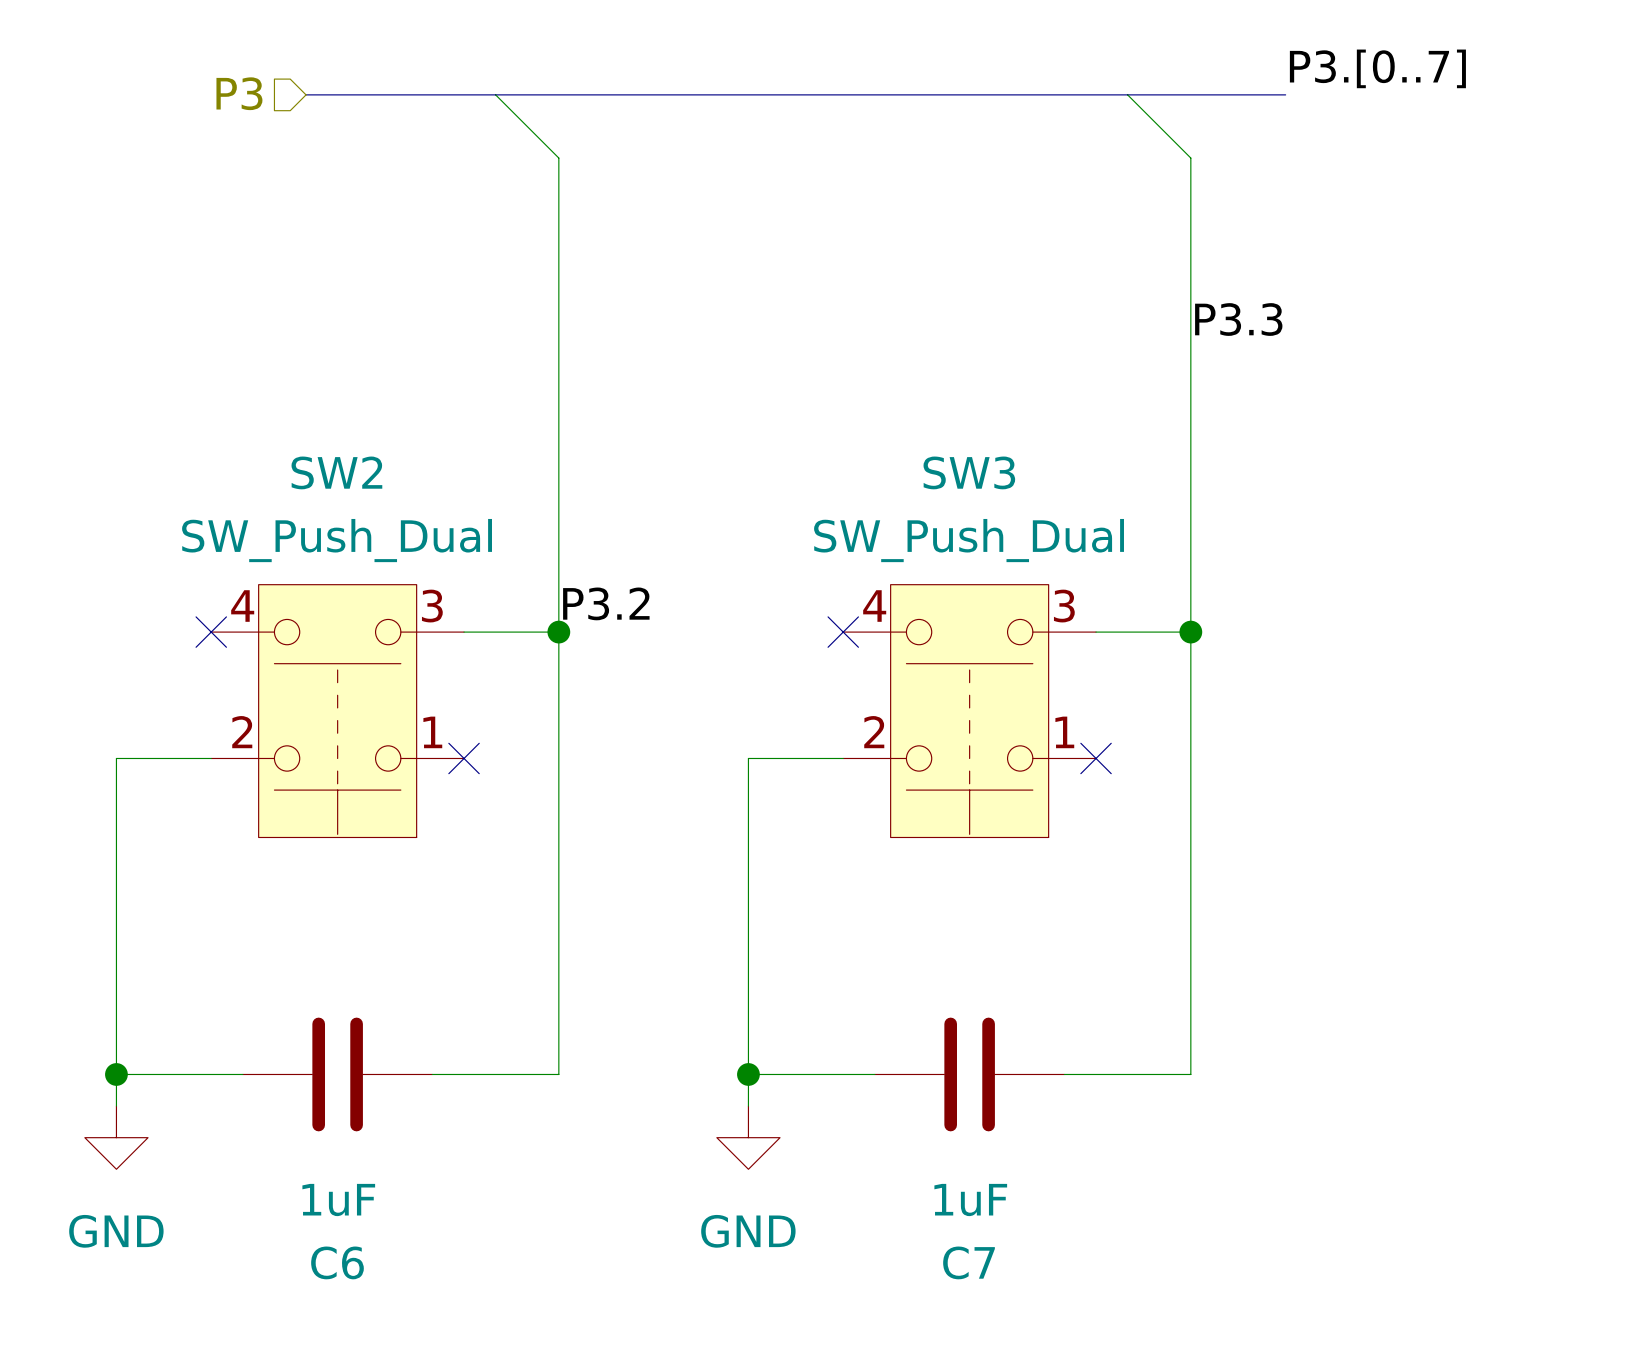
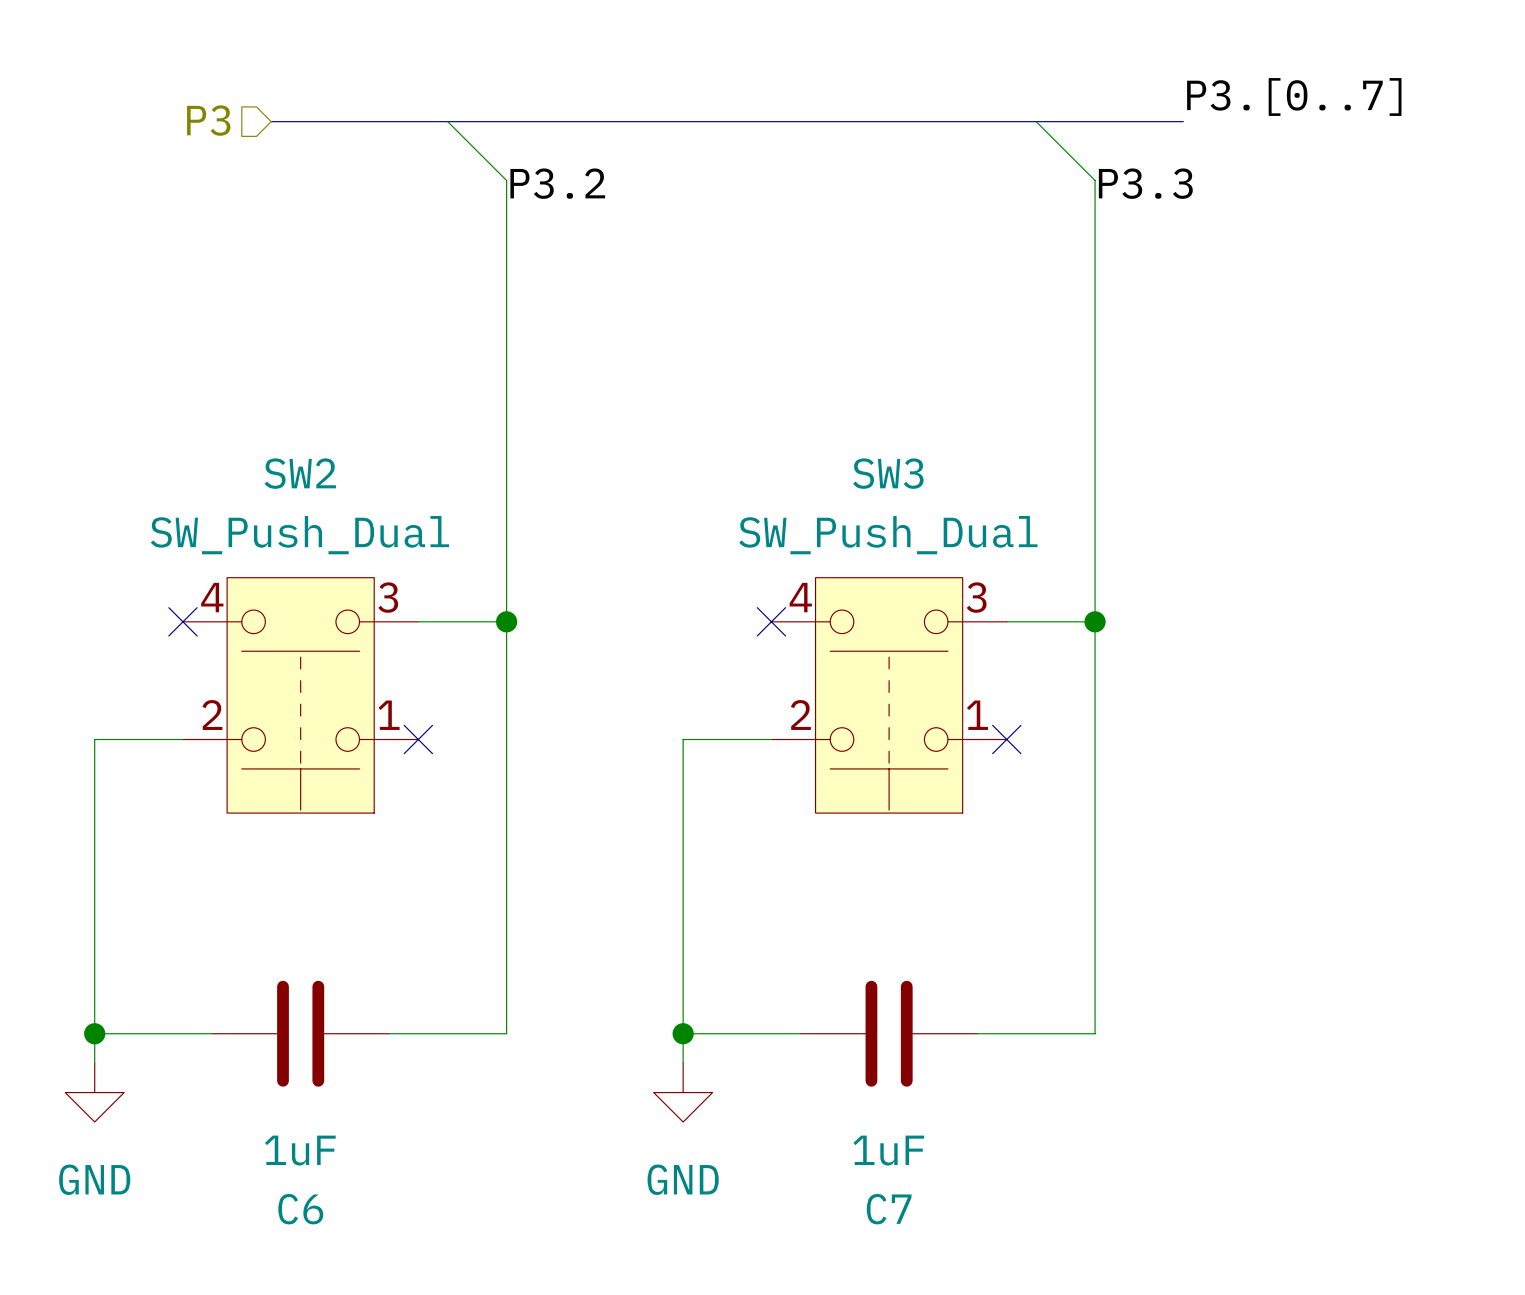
label position: P3.3 (1238, 319) -> P3.3 (1145, 183)
label position: P3.2 (606, 603) -> P3.2 (557, 183)

